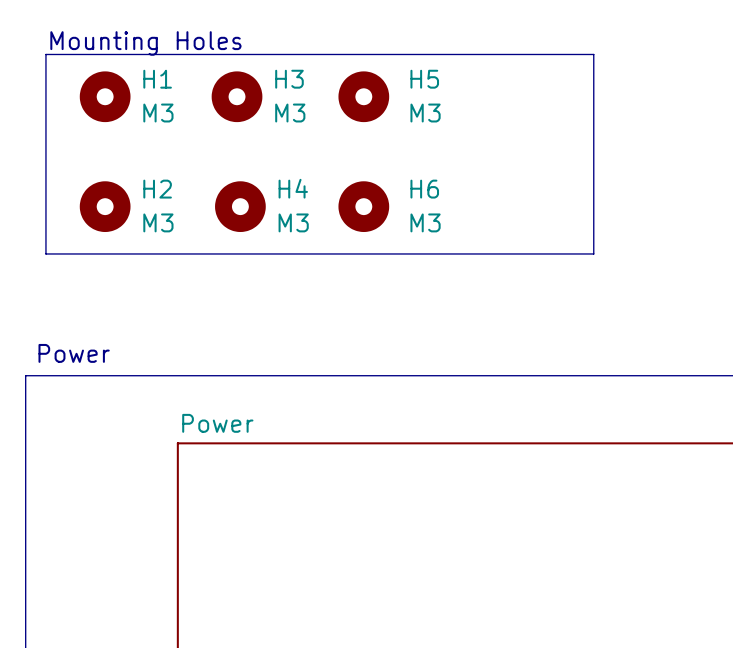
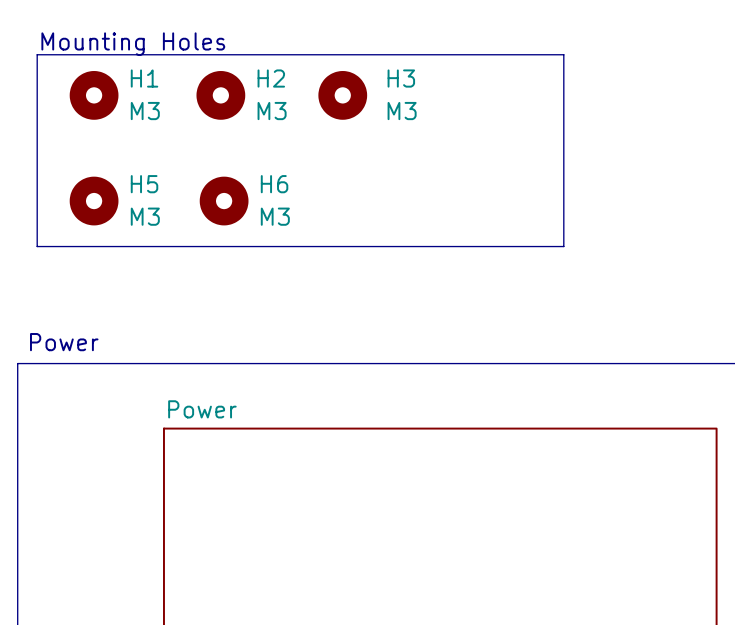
H3 name: H3 (289, 79) -> H2 (271, 78)
H5 name: H5 (424, 79) -> H3 (401, 78)
H4 name: H4 (293, 188) -> H6 (274, 184)
H2 name: H2 (157, 189) -> H5 (144, 184)
H6: M3 (363, 206) -> none

